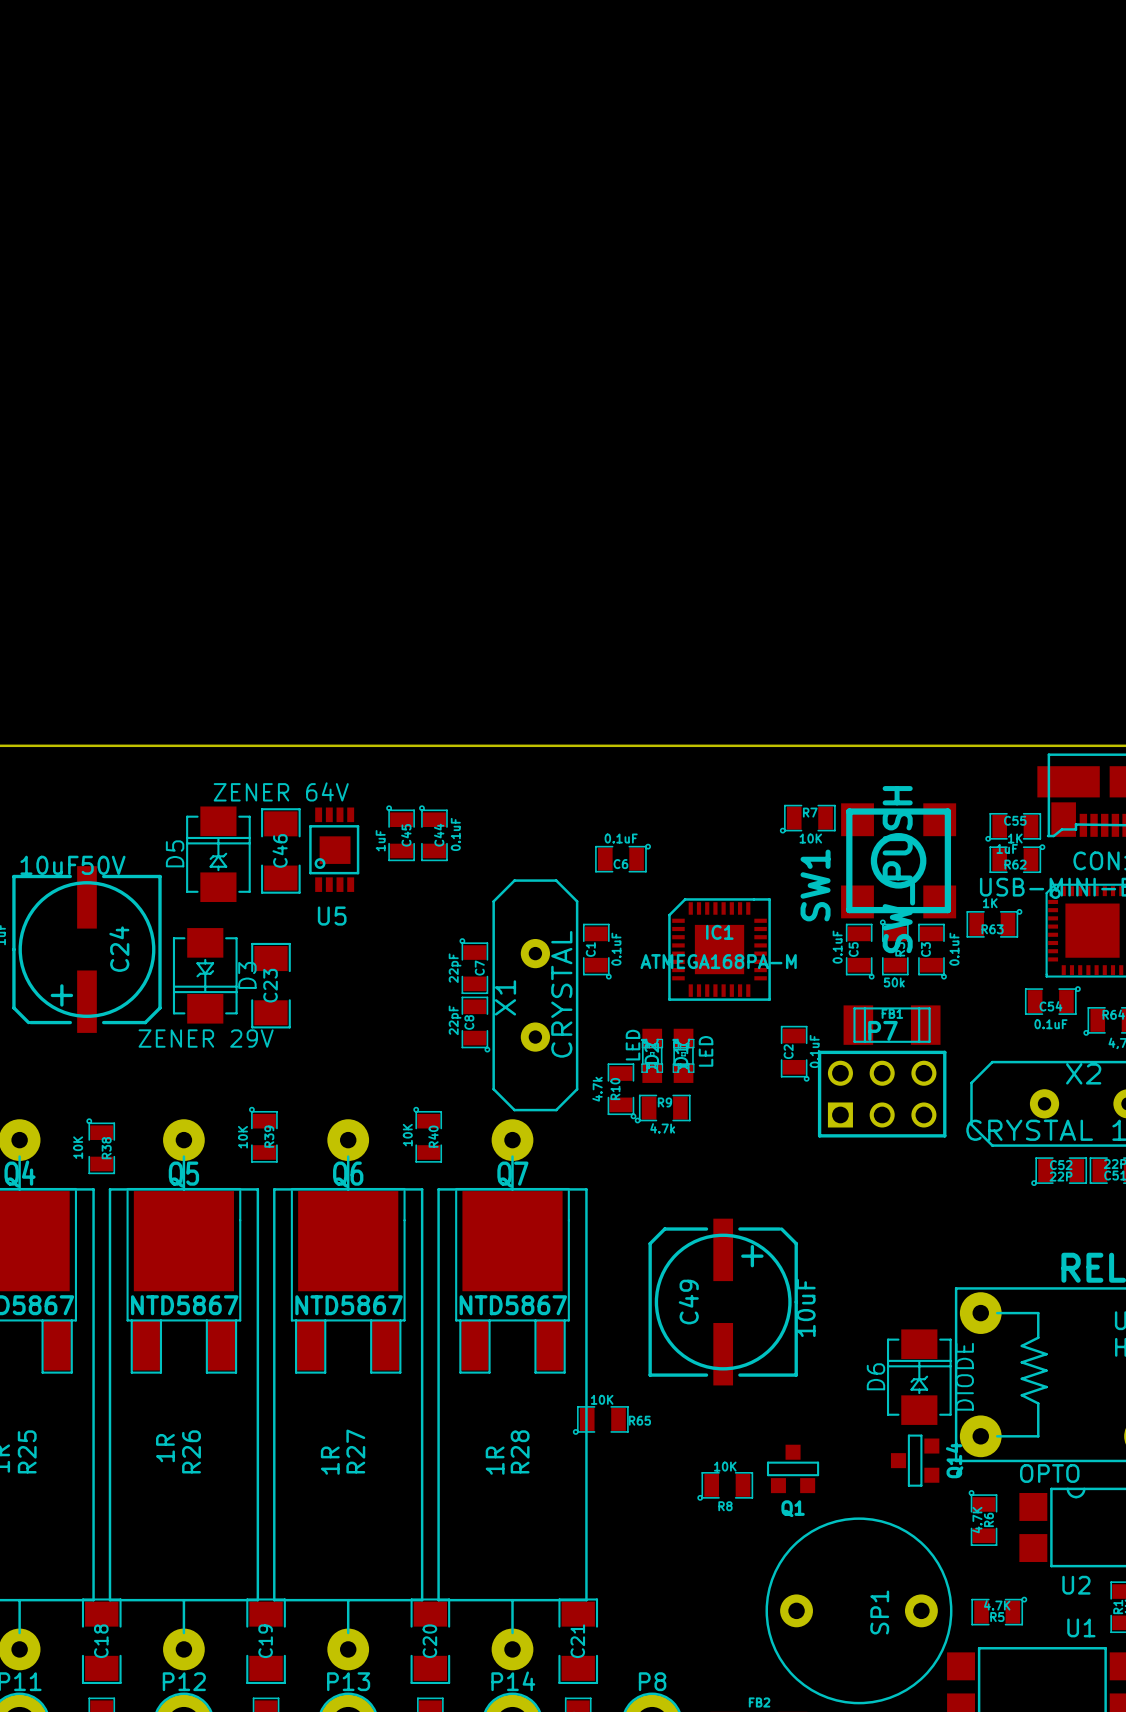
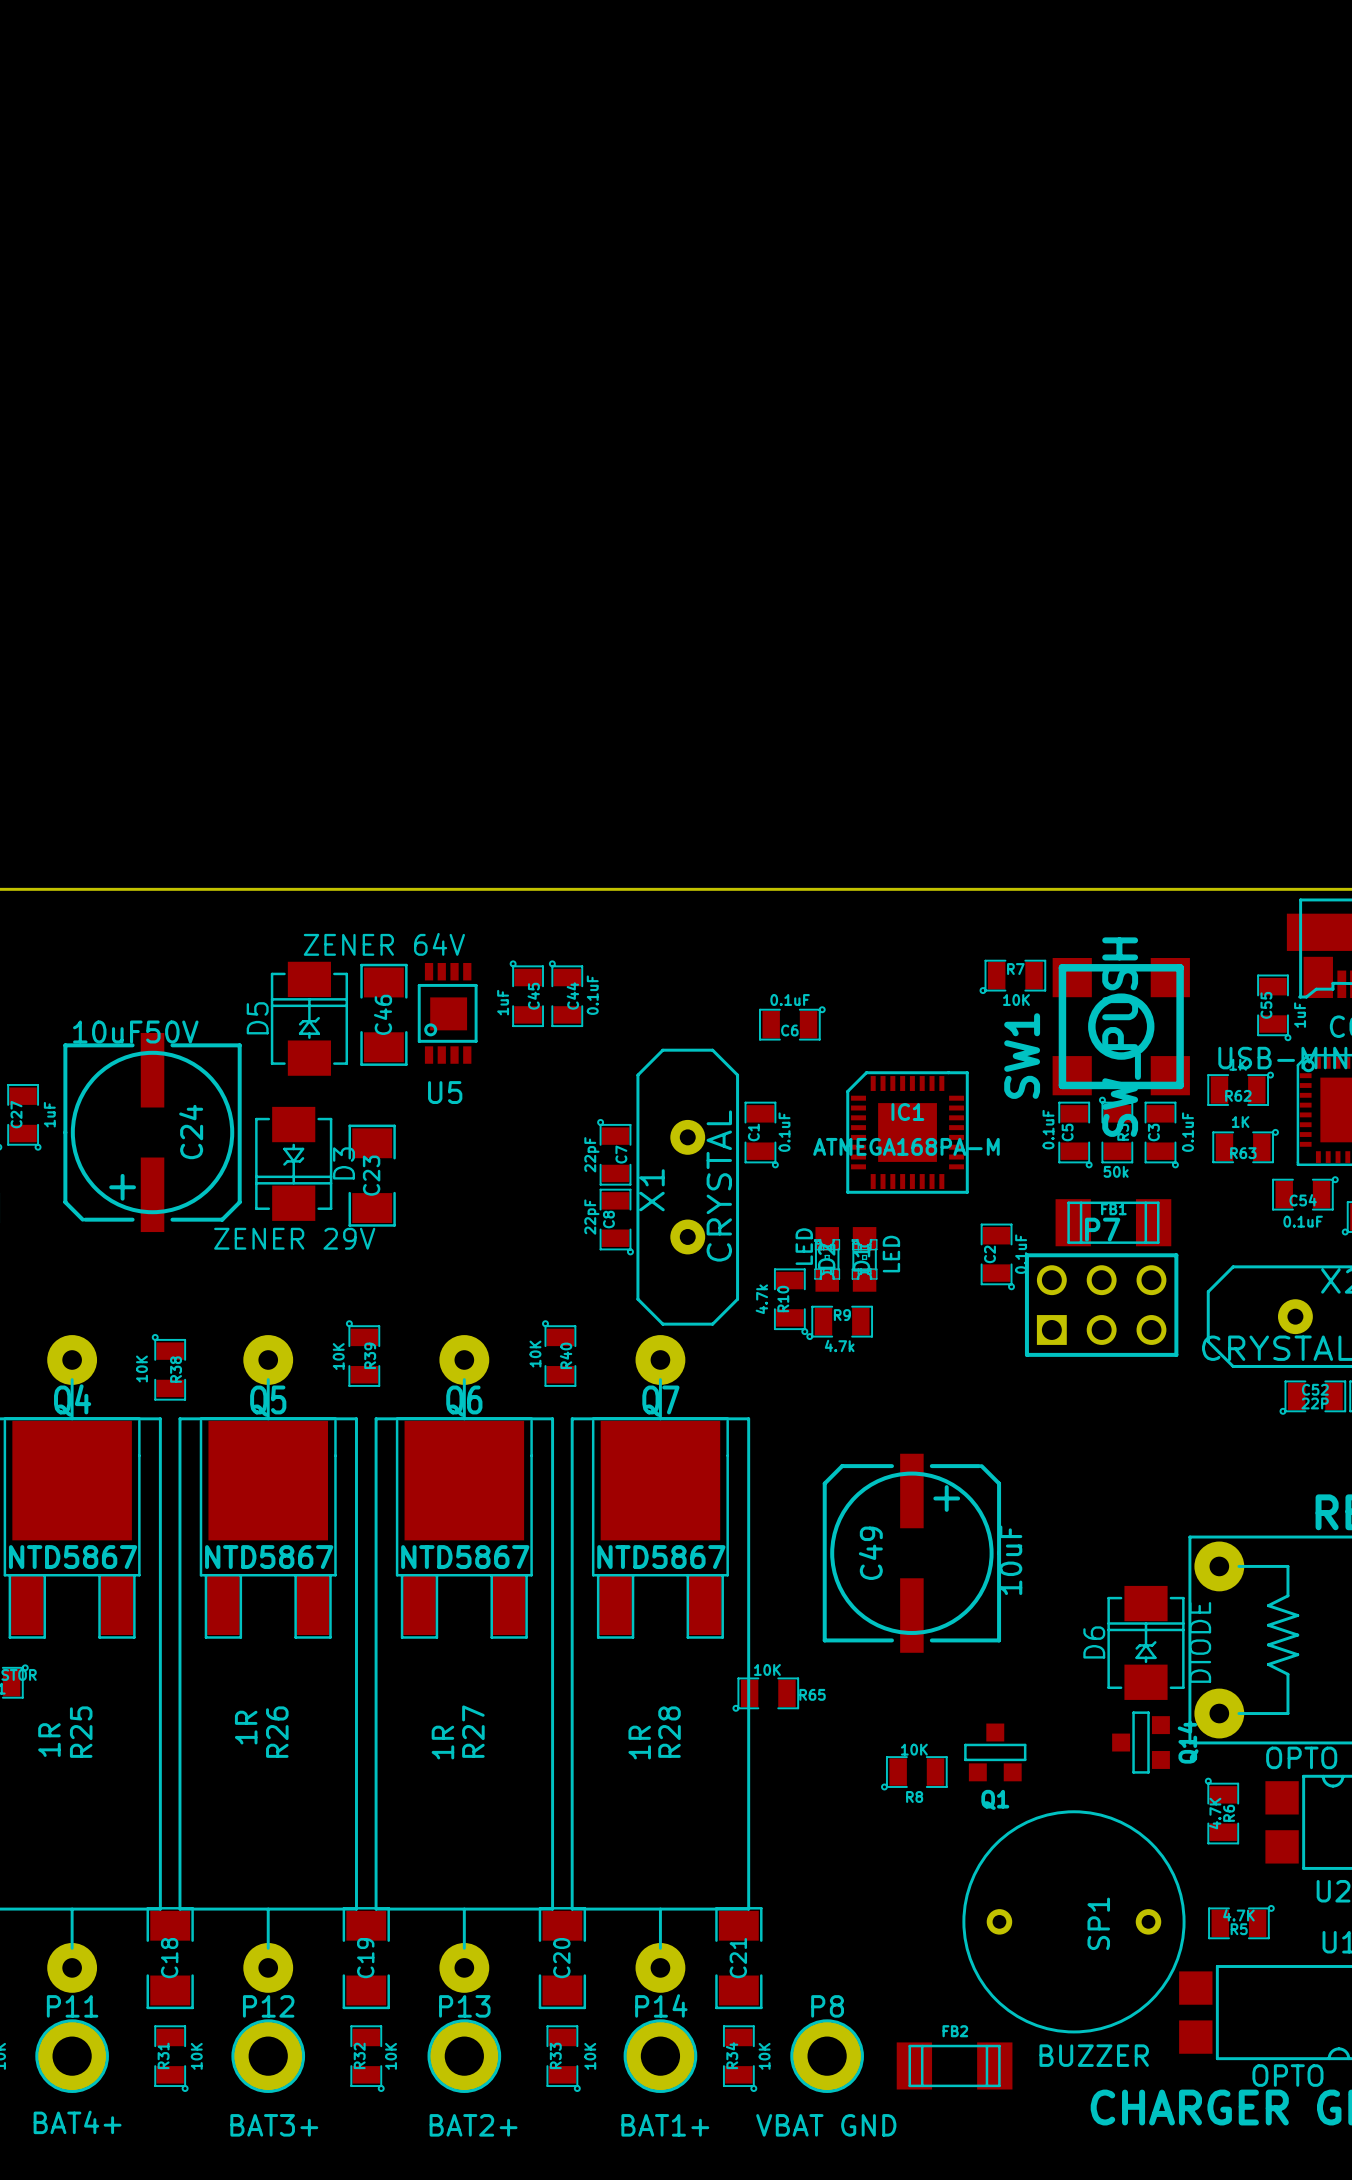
C55 rotation: 0° (1013, 827) -> 90° counterclockwise (1274, 1007)
R62 position: (1017, 858) -> (1240, 1088)
R63 position: (994, 923) -> (1245, 1146)
SP1 footprint: [765, 1517, 953, 1705] -> [962, 1810, 1186, 2034]

